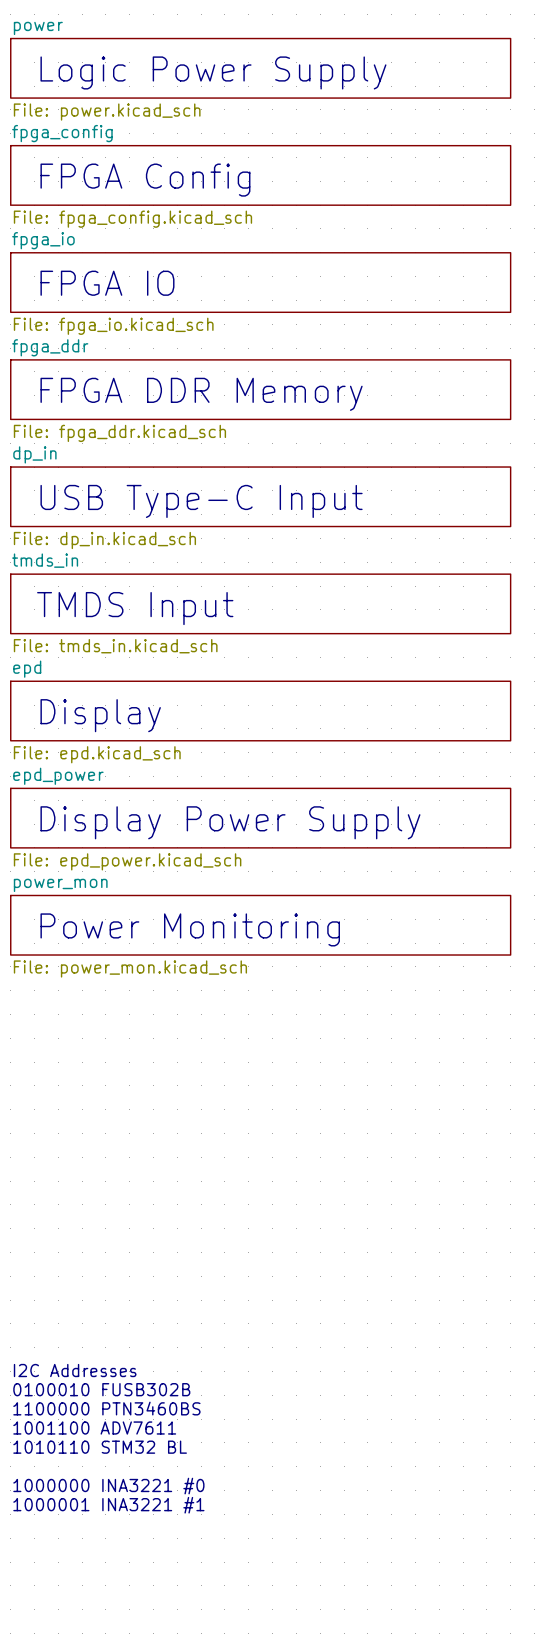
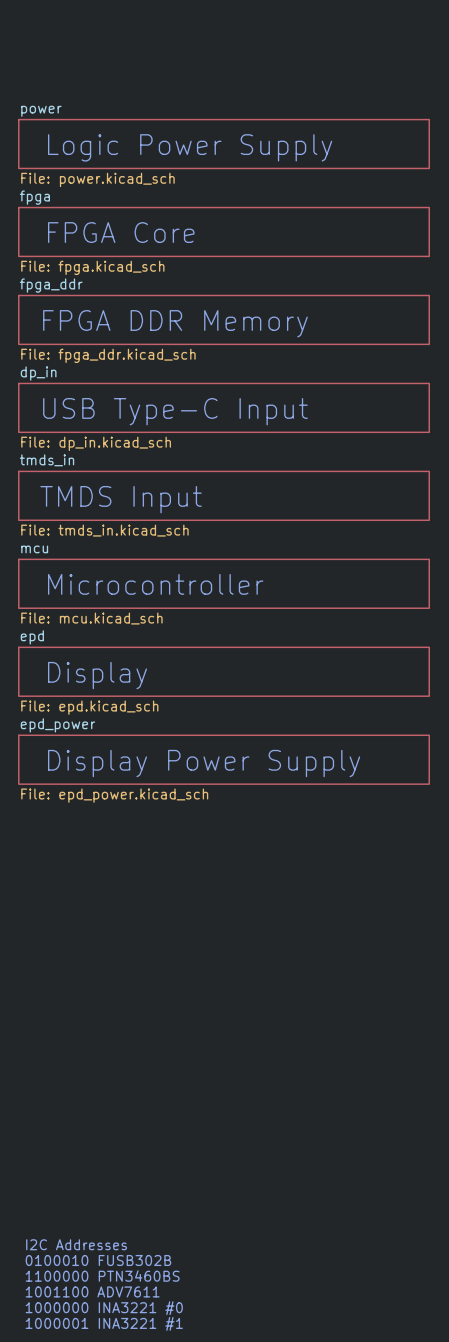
sheet power: File: power.kicad_sch (260, 68) -> none
text position: Logic Power Supply (213, 72) -> Logic Power Supply (190, 147)
sheet fpga_config name: fpga_config (62, 133) -> power (41, 111)
text: FPGA Config (145, 180) -> none
sheet fpga_config value: File: fpga_config.kicad_sch (132, 219) -> File: power.kicad_sch (97, 179)
sheet fpga_io name: fpga_io (43, 240) -> fpga (34, 197)
text: FPGA IO (107, 283) -> FPGA Core (121, 232)
sheet fpga_io value: File: fpga_io.kicad_sch (113, 326) -> File: fpga.kicad_sch (92, 267)
sheet epd name: epd (27, 669) -> mcu (34, 549)
text: none -> Microcontroller (155, 584)
text position: Display (100, 715) -> Display (97, 675)
sheet epd value: File: epd.kicad_sch (97, 754) -> File: mcu.kicad_sch (91, 618)
sheet epd_power name: epd_power (58, 776) -> epd (32, 637)
text position: Display Power Supply (230, 822) -> Display Power Supply (204, 763)
sheet epd_power value: File: epd_power.kicad_sch (127, 861) -> File: epd.kicad_sch (89, 707)
sheet power_mon name: power_mon (60, 885) -> epd_power (57, 725)
text: Power Monitoring (190, 929) -> none
sheet power_mon value: File: power_mon.kicad_sch (130, 968) -> File: epd_power.kicad_sch (114, 795)
text position: I2C Addresses (75, 1370) -> I2C Addresses (76, 1244)
text position: 0100010 FUSB302B (101, 1389) -> 0100010 FUSB302B (98, 1260)
text position: 1100000 PTN3460BS (106, 1408) -> 1100000 PTN3460BS (102, 1275)
text position: 1001100 ADV7611 (94, 1428) -> 1001100 ADV7611 (92, 1291)
text: 1010110 STM32 BL (100, 1447) -> none
text position: 1000000 INA3221 #0 (108, 1486) -> 1000000 INA3221 #0 (104, 1308)
text position: 1000001 INA3221 #1 (108, 1505) -> 1000001 INA3221 #1 (104, 1323)

